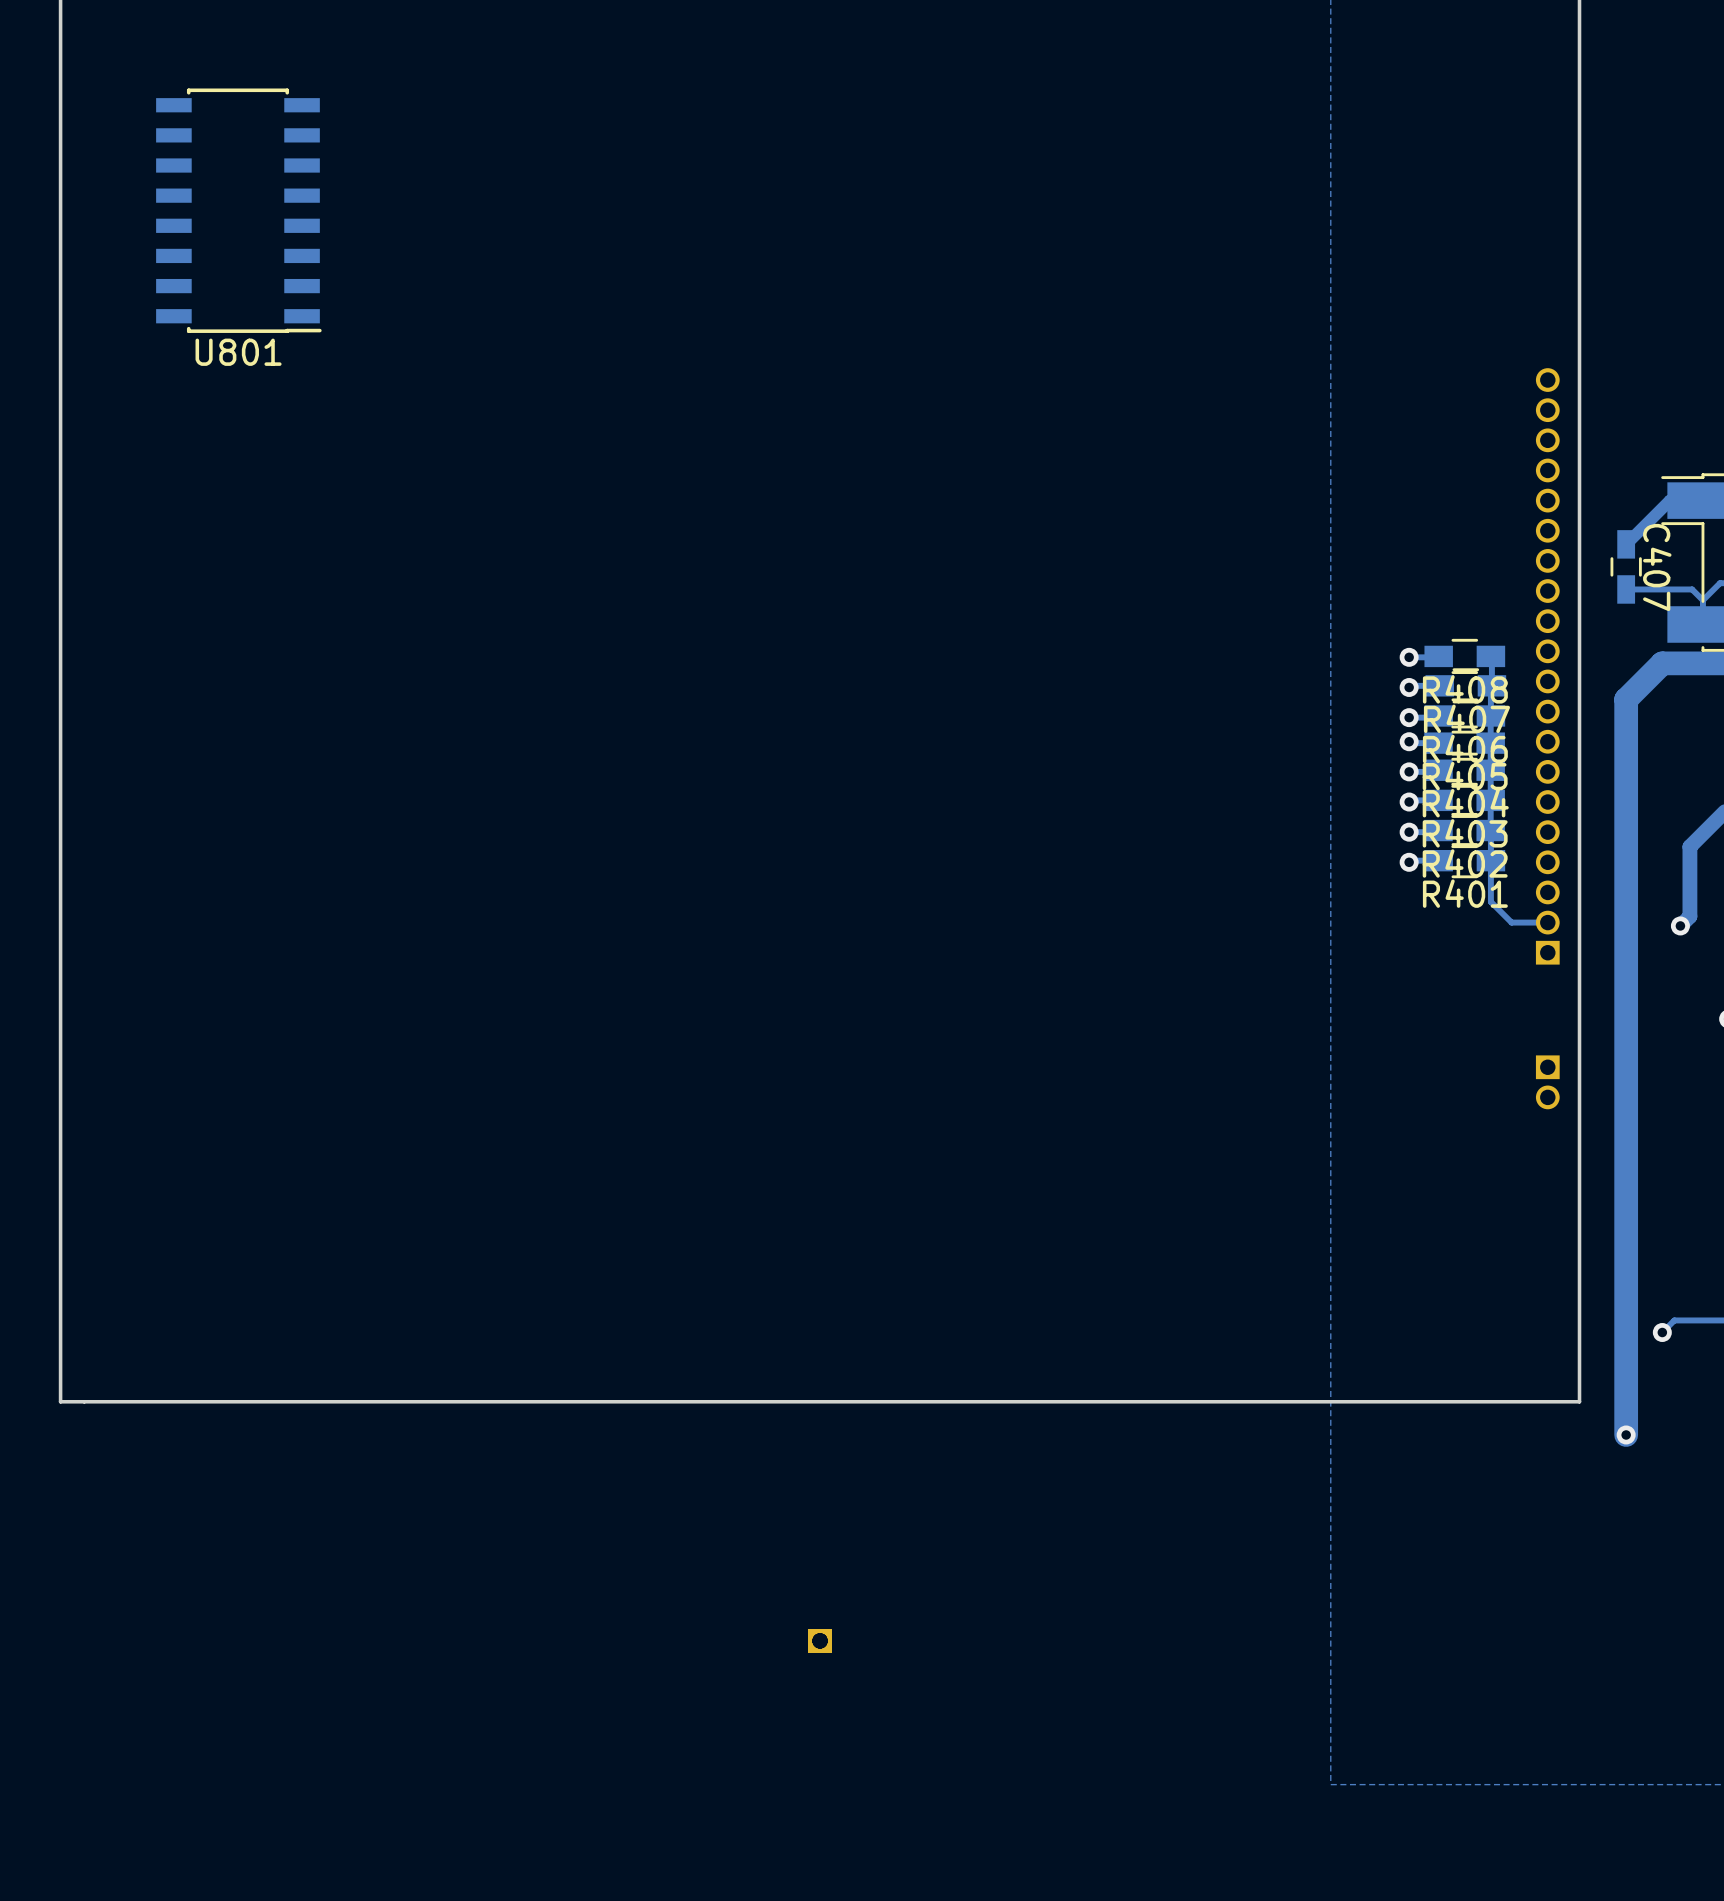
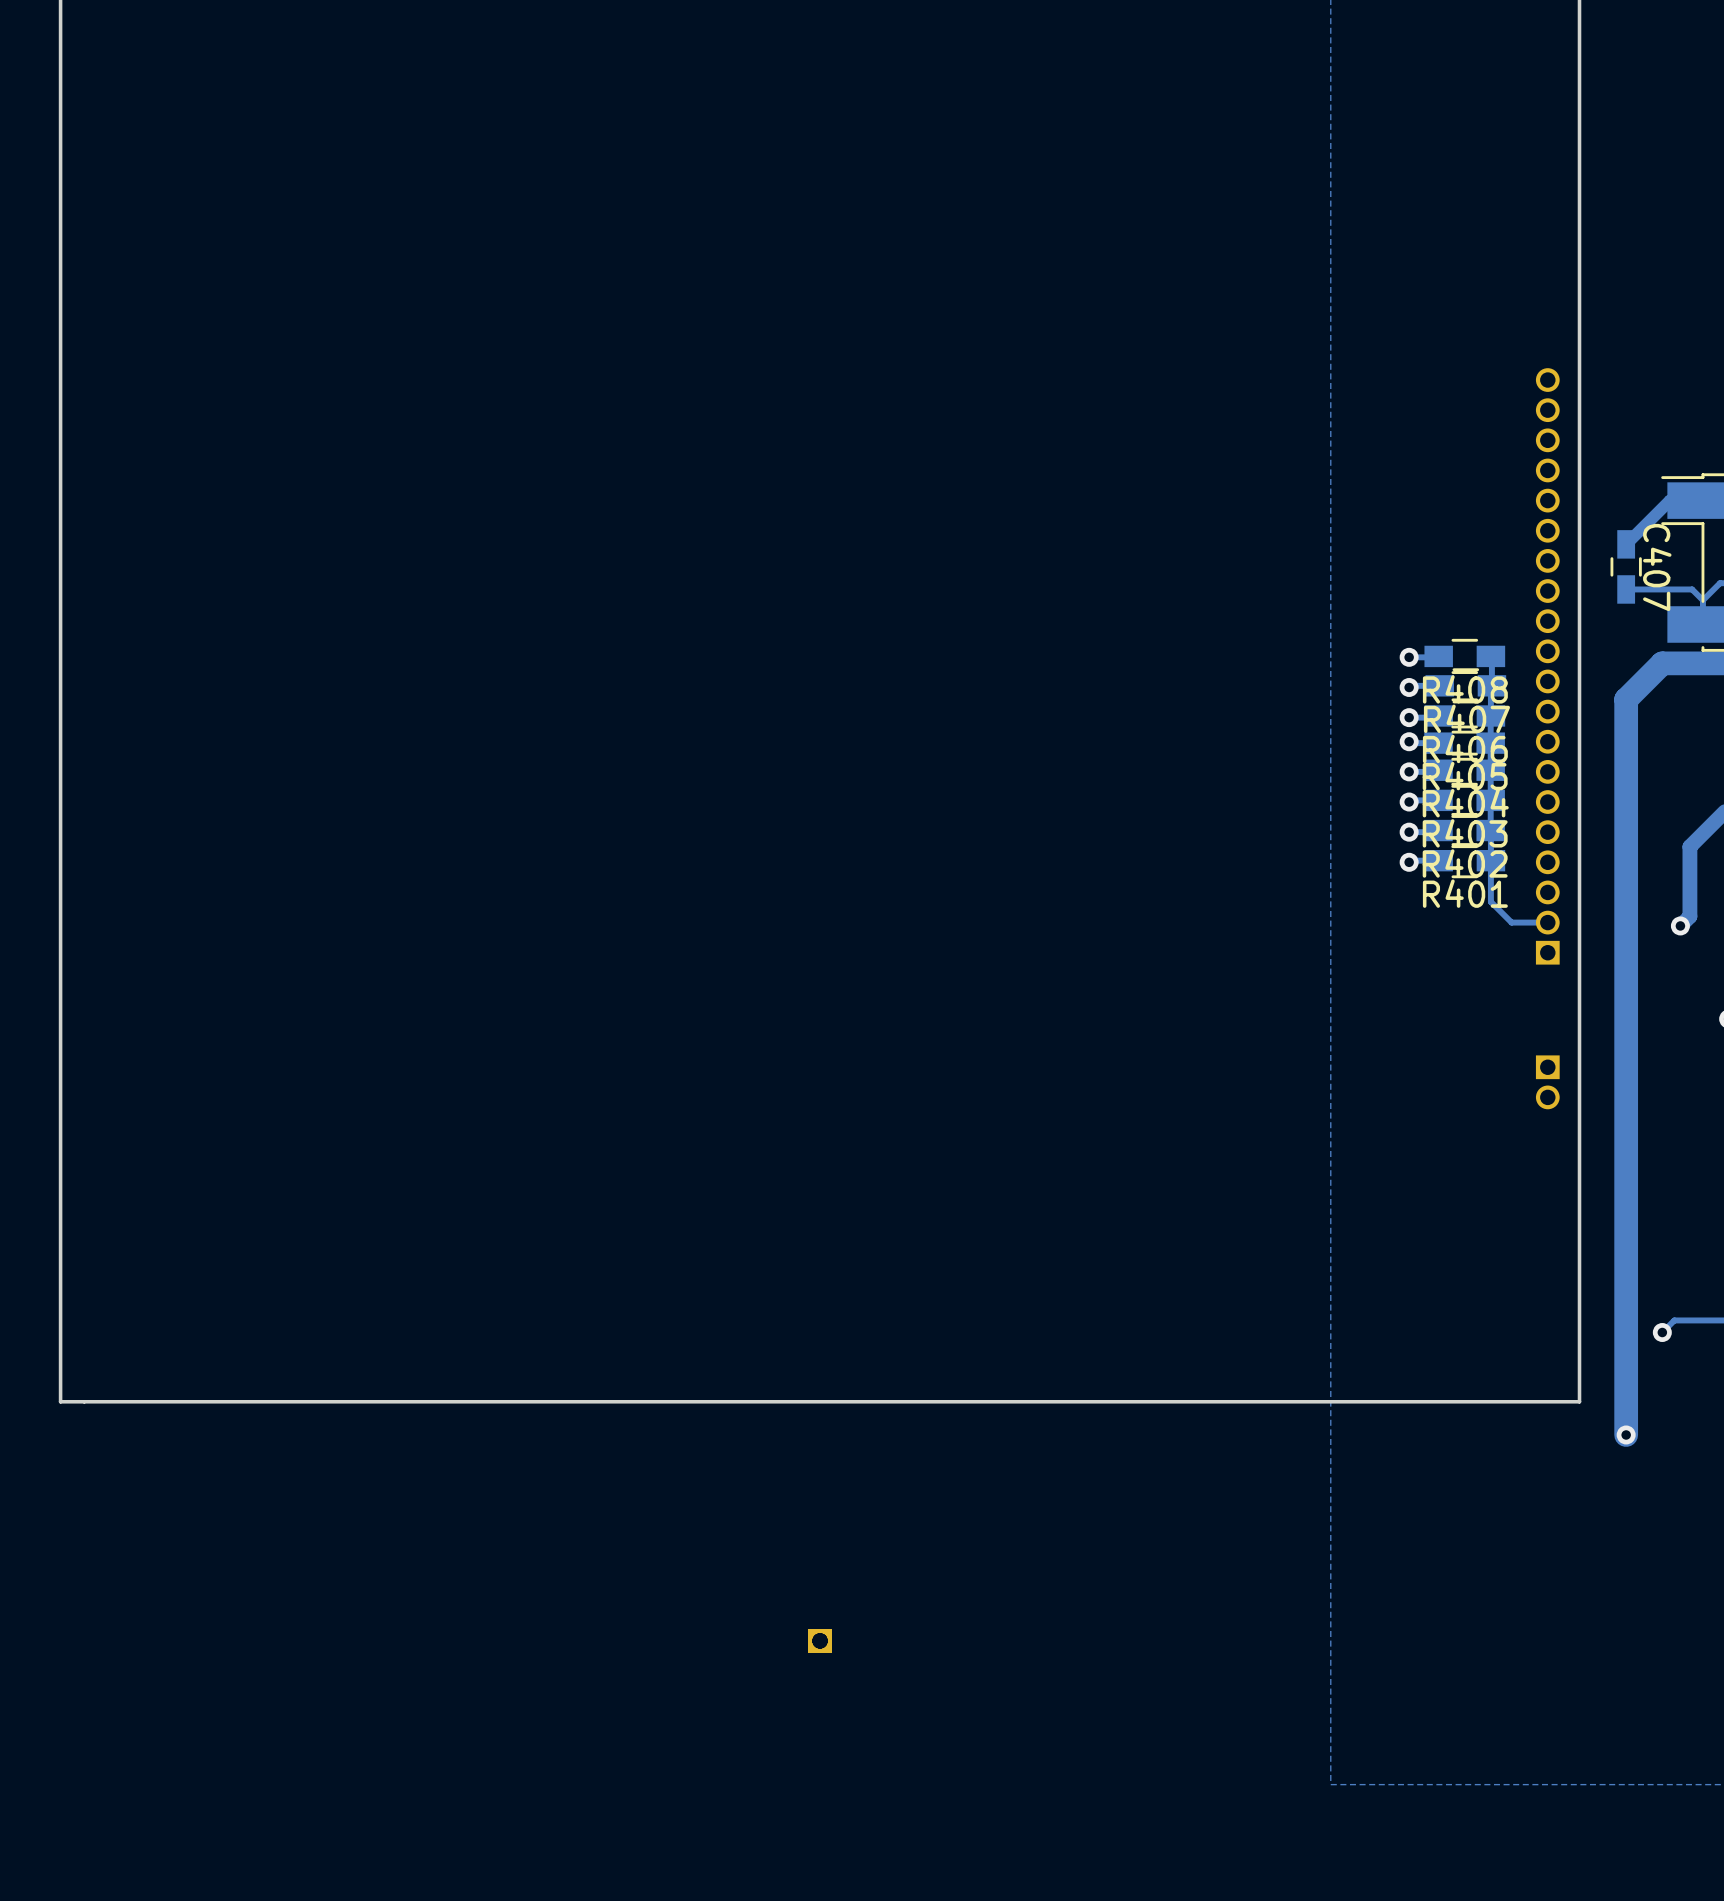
U801: (238, 210) -> none

